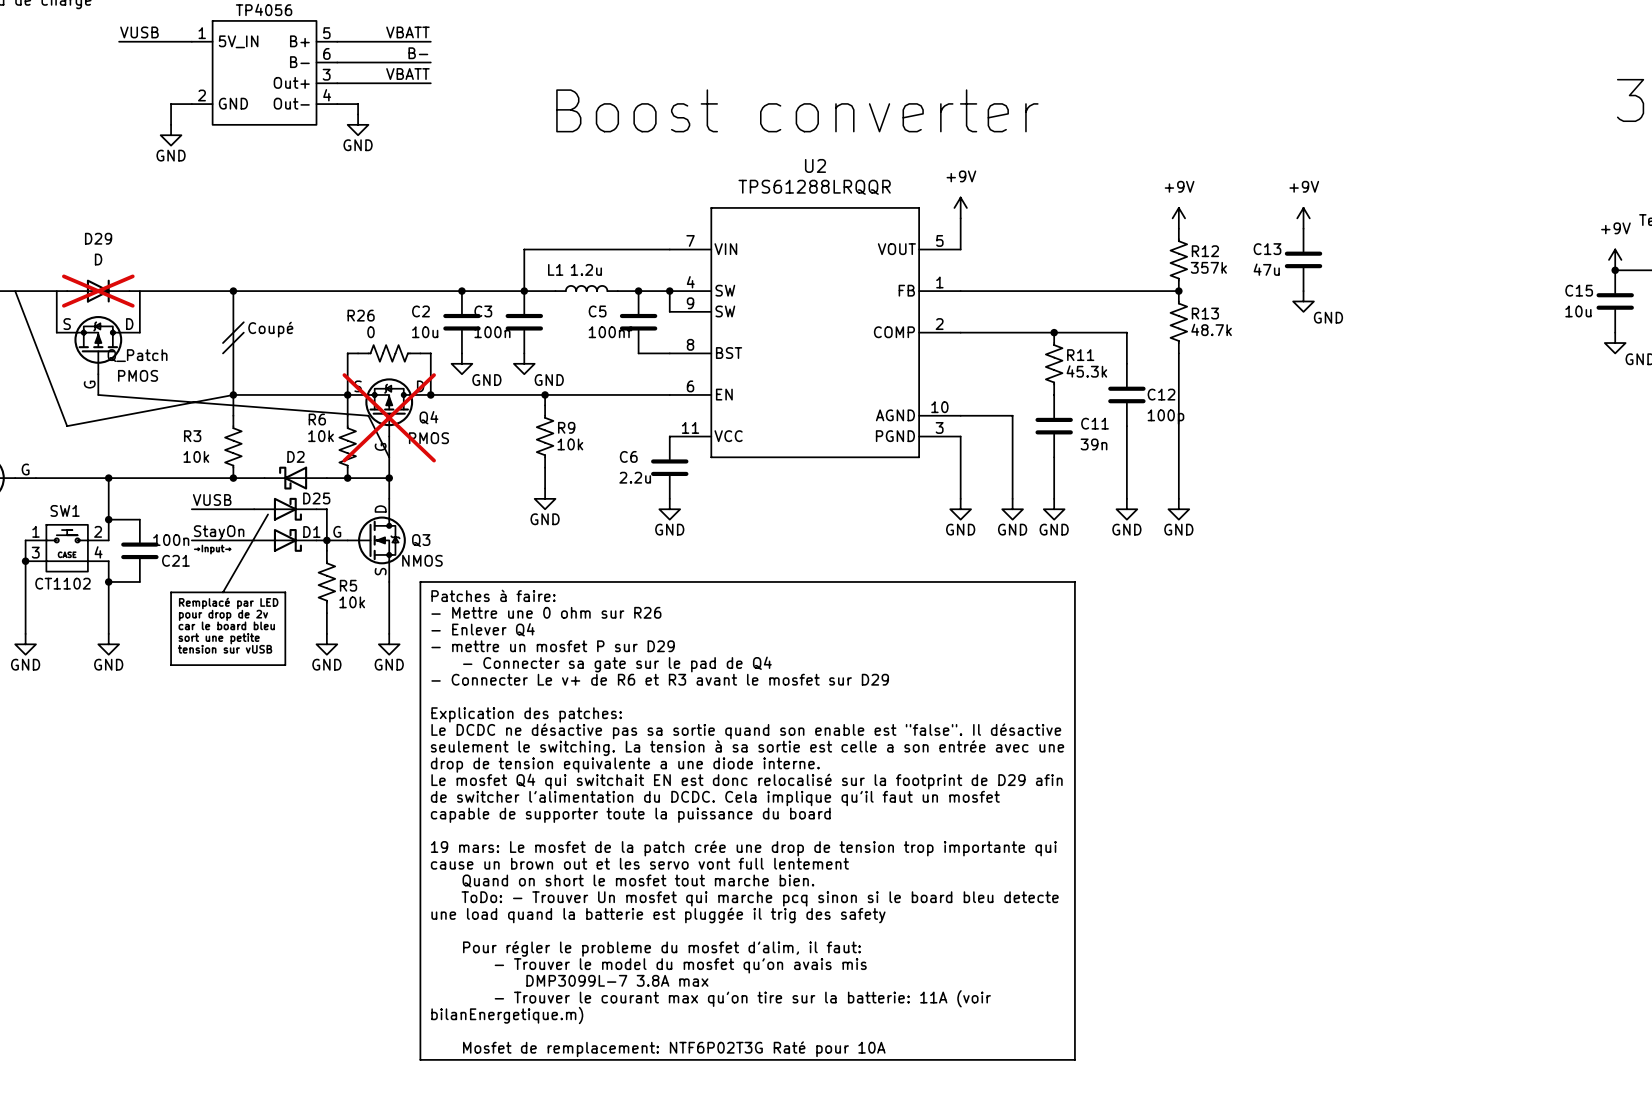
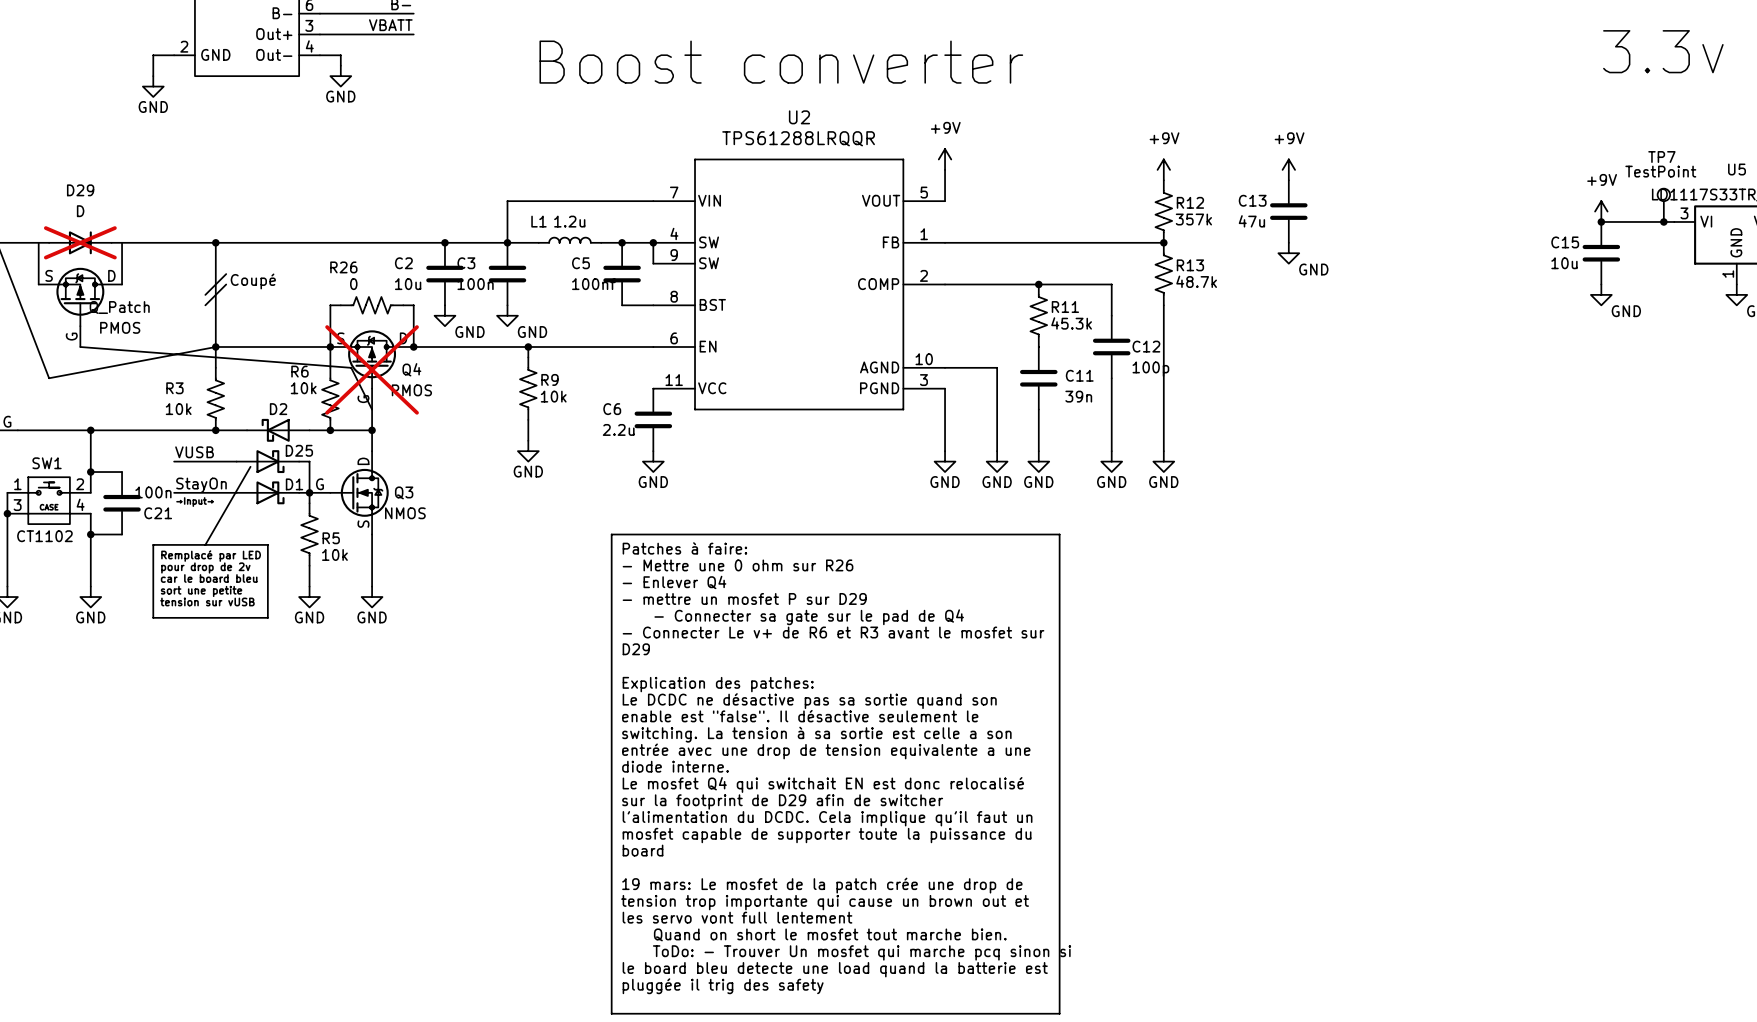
line: (628, 581) (420, 581) (420, 1059) (628, 1059) -> (611, 534) (611, 1013)
text: Patches à faire: (493, 595) -> none
text: none -> Patches à faire: (684, 548)
text: - Mettre une 0 ohm sur R26 (546, 612) -> none
text: none -> - Mettre une 0 ohm sur R26 (738, 565)
text: - Enlever Q4 (483, 629) -> none
text: none -> - Enlever Q4 (674, 582)
text: - mettre un mosfet P sur D29 (553, 646) -> none
text: none -> - mettre un mosfet P sur D29 (744, 598)
text: - Connecter sa gate sur le pad de Q4 (617, 664) -> none
text: none -> - Connecter sa gate sur le pad de Q4 (809, 617)
text: - Connecter Le v+ de R6 et R3 avant le mosfet sur D29 (660, 679) -> none
text: none -> - Connecter Le v+ de R6 et R3 avant le mosfet sur (833, 632)
text: none -> D29 (636, 649)
text: Explication des patches: (526, 714) -> none
text: none -> Explication des patches: (718, 684)
text: Le DCDC ne désactive pas sa sortie quand son enable est "false". Il désactive (746, 731) -> none
text: seulement le switching. La tension à sa sortie est celle a son entrée avec une (747, 748) -> none
text: none -> Le DCDC ne désactive pas sa sortie quand son (809, 701)
text: none -> enable est "false". Il désactive seulement le (800, 716)
text: drop de tension equivalente a une diode interne. (625, 765) -> none
text: Le mosfet Q4 qui switchait EN est donc relocalisé sur la footprint de D29 afin (747, 781) -> none
text: none -> switching. La tension à sa sortie est celle a son (816, 734)
text: de switcher l'alimentation du DCDC. Cela implique qu'il faut un mosfet (715, 798) -> none
text: none -> entrée avec une drop de tension equivalente a une (826, 751)
text: none -> diode interne. (675, 766)
text: capable de supporter toute la puissance du board (630, 815) -> none
text: none -> Le mosfet Q4 qui switchait EN est donc relocalisé (823, 784)
text: 19 mars: Le mosfet de la patch crée une drop de tension trop importante qui (743, 848) -> none
text: none -> sur la footprint de D29 afin de switcher (782, 801)
text: cause un brown out et les servo vont full lentement (639, 863) -> none
text: none -> l'alimentation du DCDC. Cela implique qu'il faut un (827, 818)
text: Quand on short le mosfet tout marche bien. (638, 880) -> none
text: none -> mosfet capable de supporter toute la puissance du (827, 835)
text: none -> board (643, 850)
text: ToDo: - Trouver Un mosfet qui marche pcq sinon si le board bleu detecte (760, 898) -> none
text: une load quand la batterie est pluggée il trig des safety (658, 915) -> none
text: none -> 19 mars: Le mosfet de la patch crée une drop de (822, 885)
text: Pour régler le probleme du mosfet d'alim, il faut: (661, 948) -> none
text: none -> tension trop importante qui cause un brown out et (825, 902)
text: none -> les servo vont full lentement (737, 917)
text: - Trouver le model du mosfet qu'on avais mis (680, 965) -> none
text: DMP3099L-7 3.8A max (617, 980) -> none
text: none -> Quand on short le mosfet tout marche bien. (830, 934)
text: - Trouver le courant max qu'on tire sur la batterie: 11A (voir (742, 998) -> none
text: none -> ToDo: - Trouver Un mosfet qui marche pcq sinon si (862, 952)
text: bilanEnergetique.m) (507, 1015) -> none
text: none -> le board bleu detecte une load quand la batterie est (835, 969)
text: none -> pluggée il trig des safety (723, 986)
text: Mosfet de remplacement: NTF6P02T3G Raté pour 10A (674, 1049) -> none

